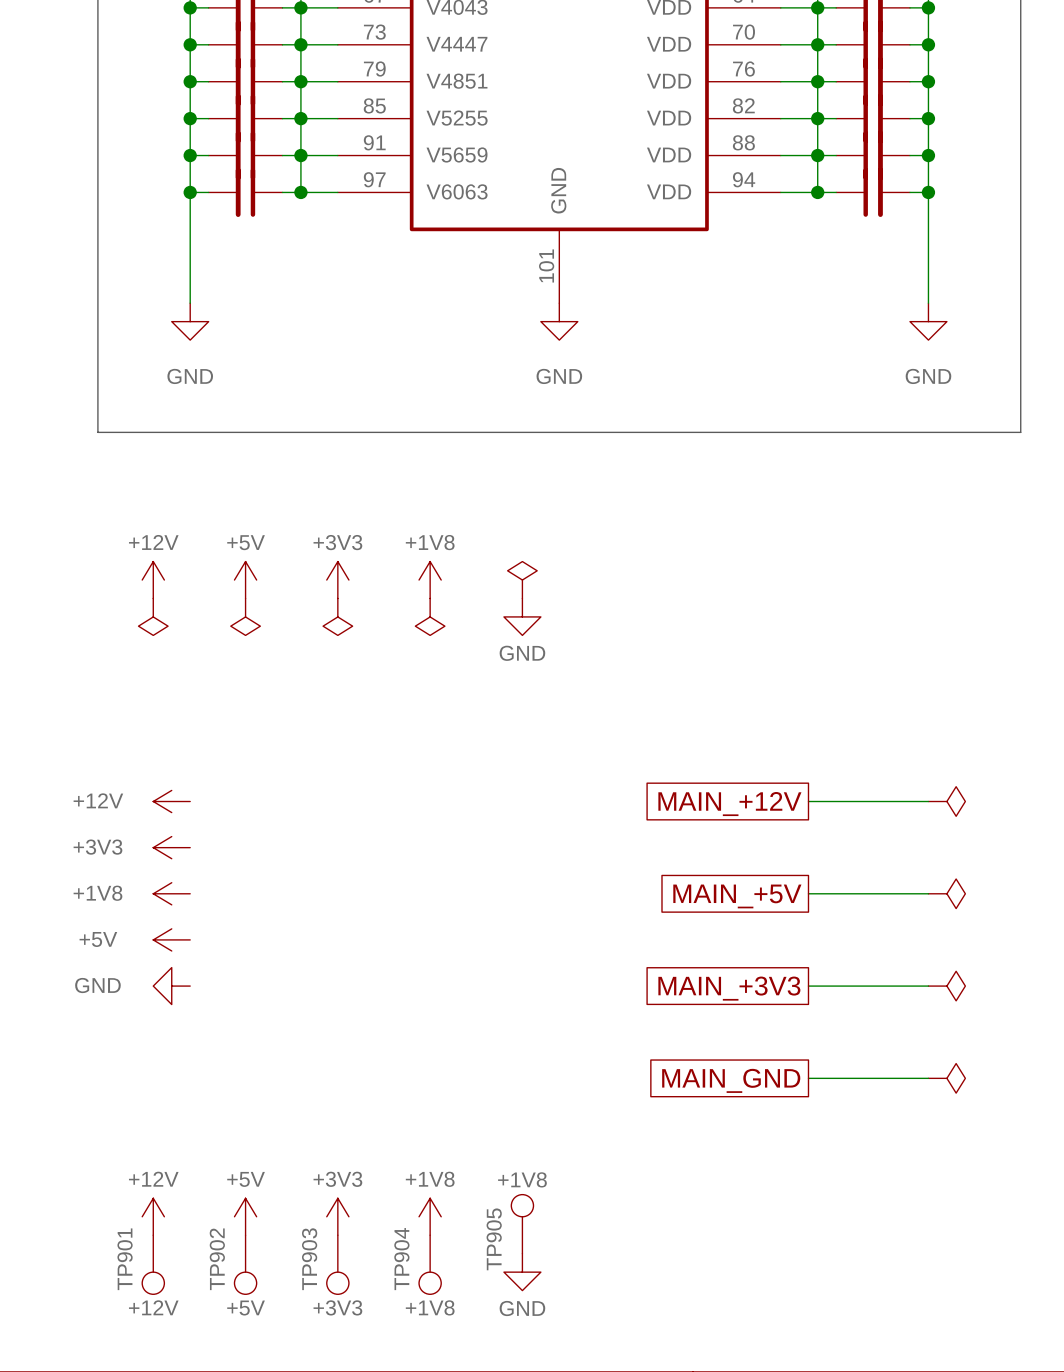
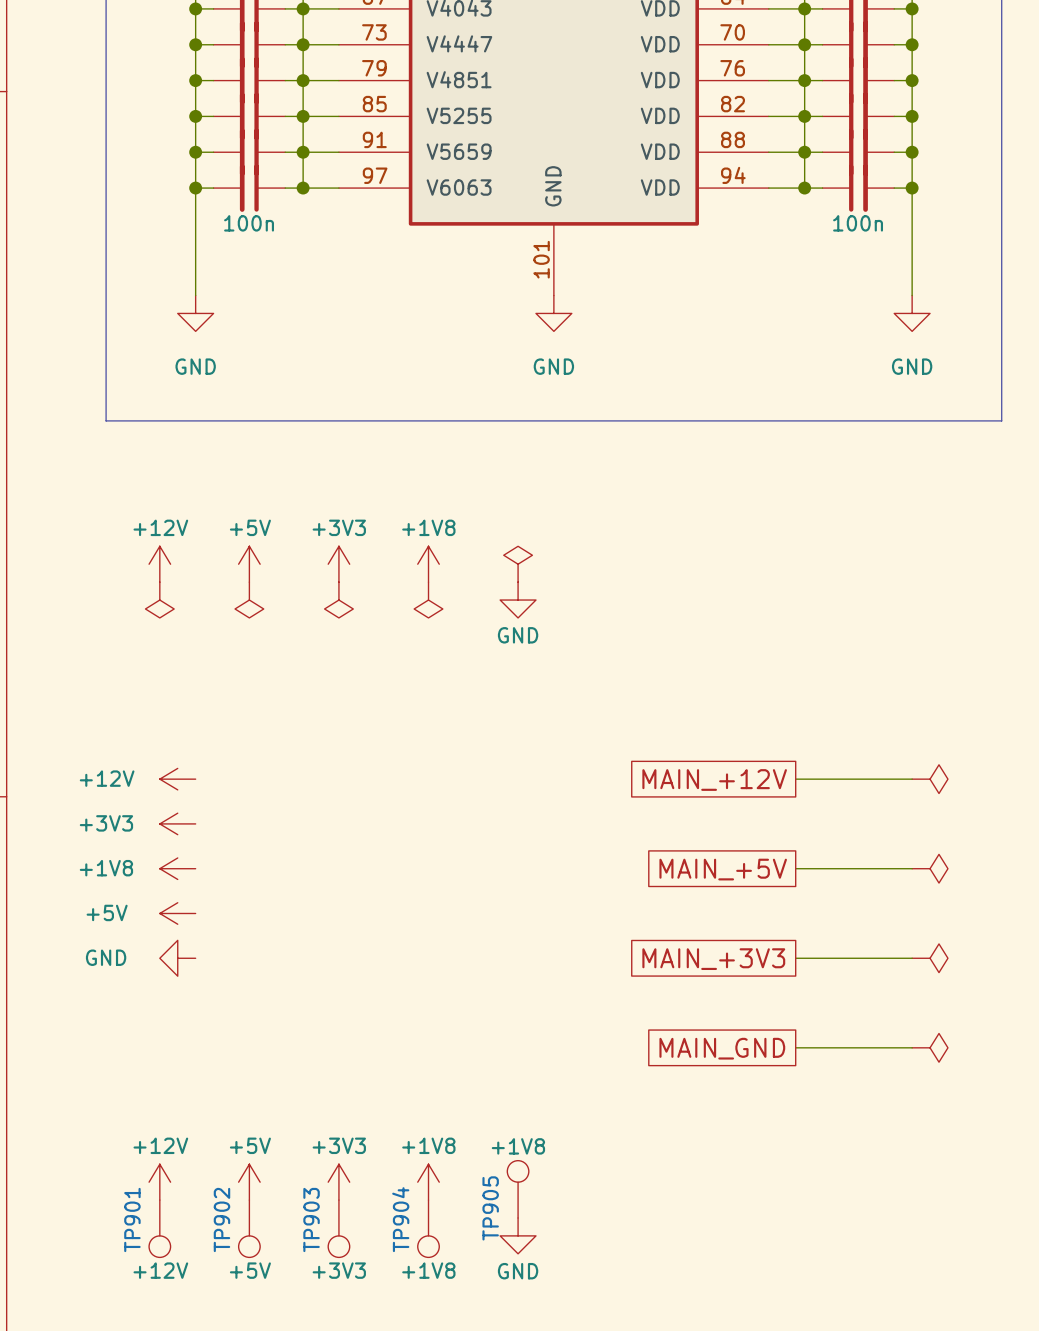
part value: none -> 100n (249, 223)
part value: none -> 100n (858, 223)

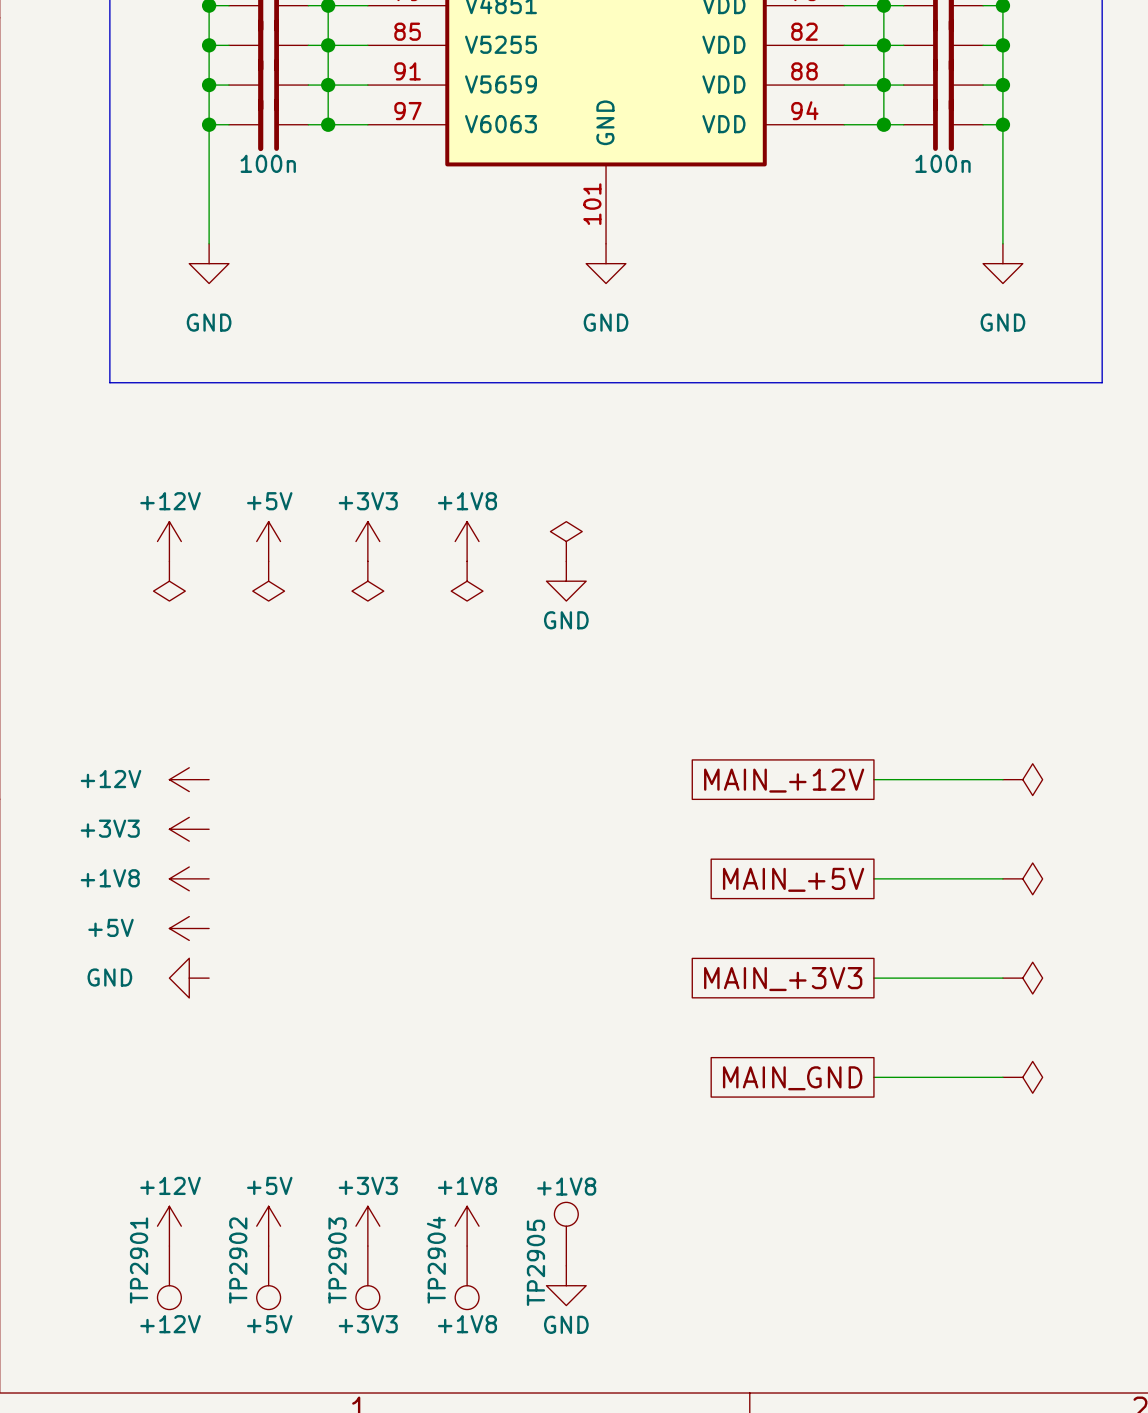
TP905 name: TP905 (490, 1208) -> TP2905 (535, 1262)
TP901 name: TP901 (132, 1219) -> TP2901 (139, 1260)
TP902 name: TP902 (221, 1219) -> TP2902 (238, 1260)
TP903 name: TP903 (311, 1219) -> TP2903 (337, 1260)
TP904 name: TP904 (400, 1219) -> TP2904 (436, 1260)

